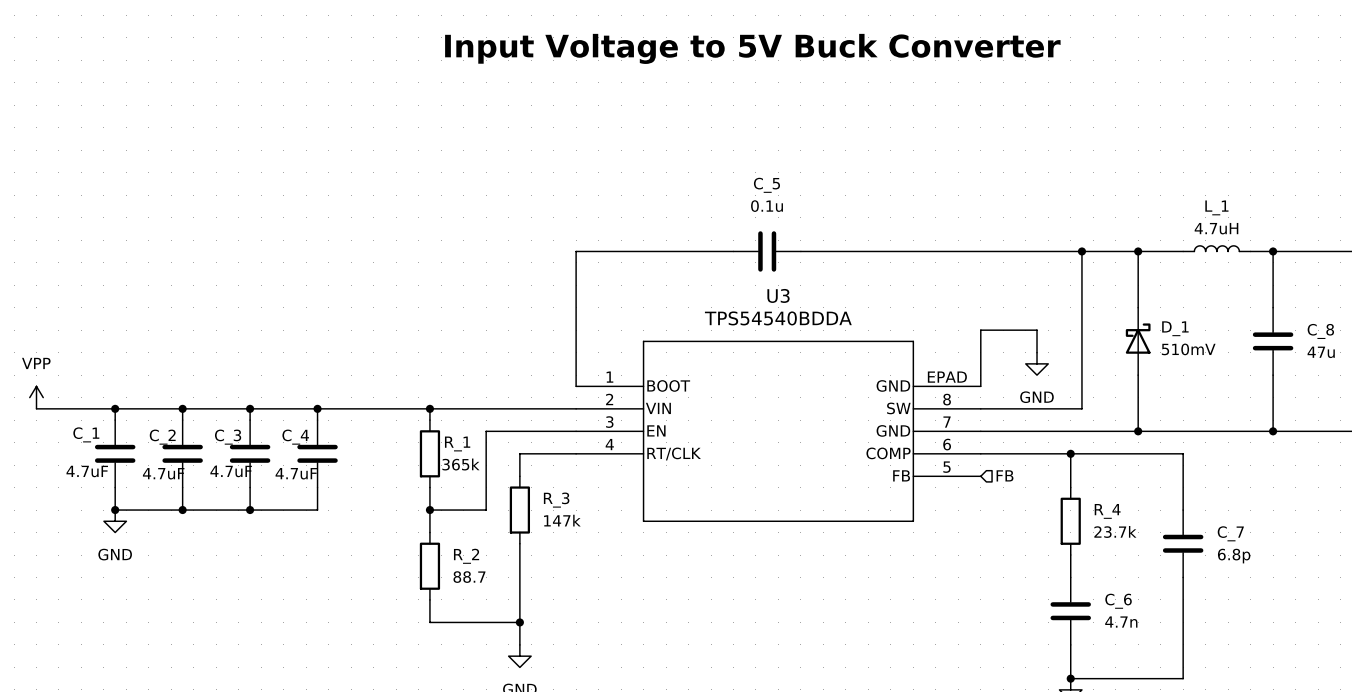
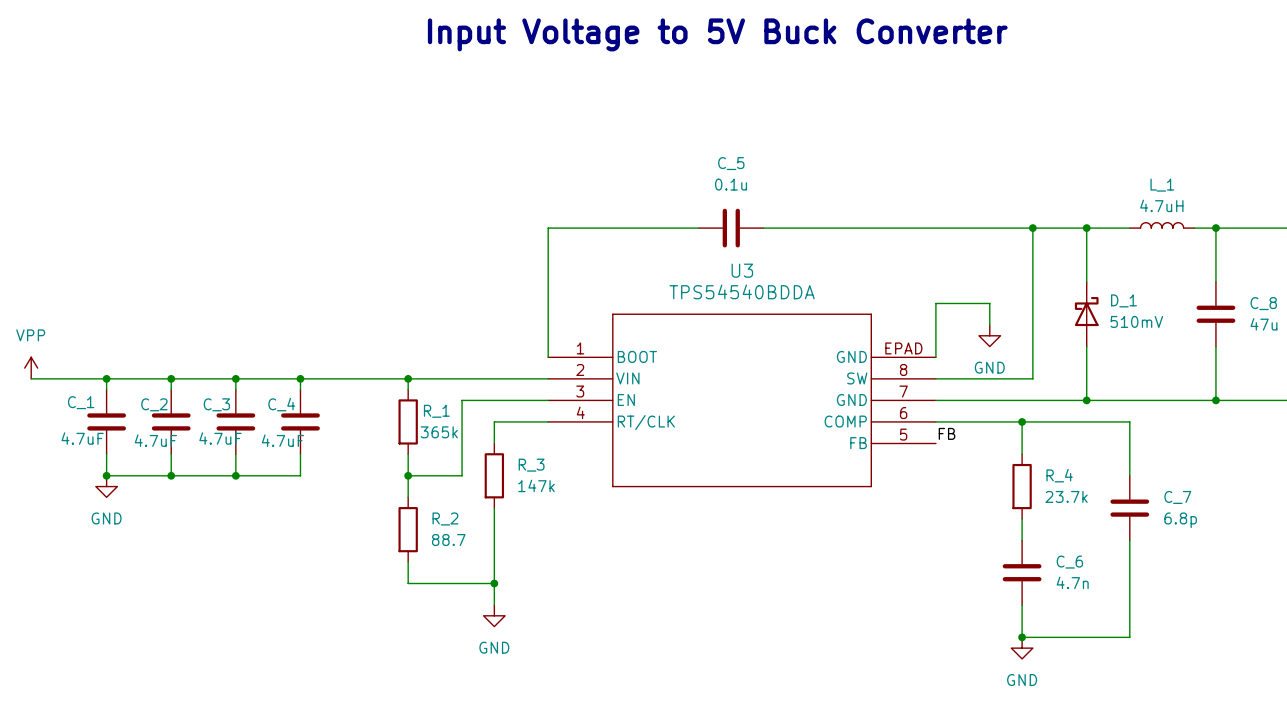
label: none -> FB (947, 433)
hierarchical label: FB (1005, 475) -> none

